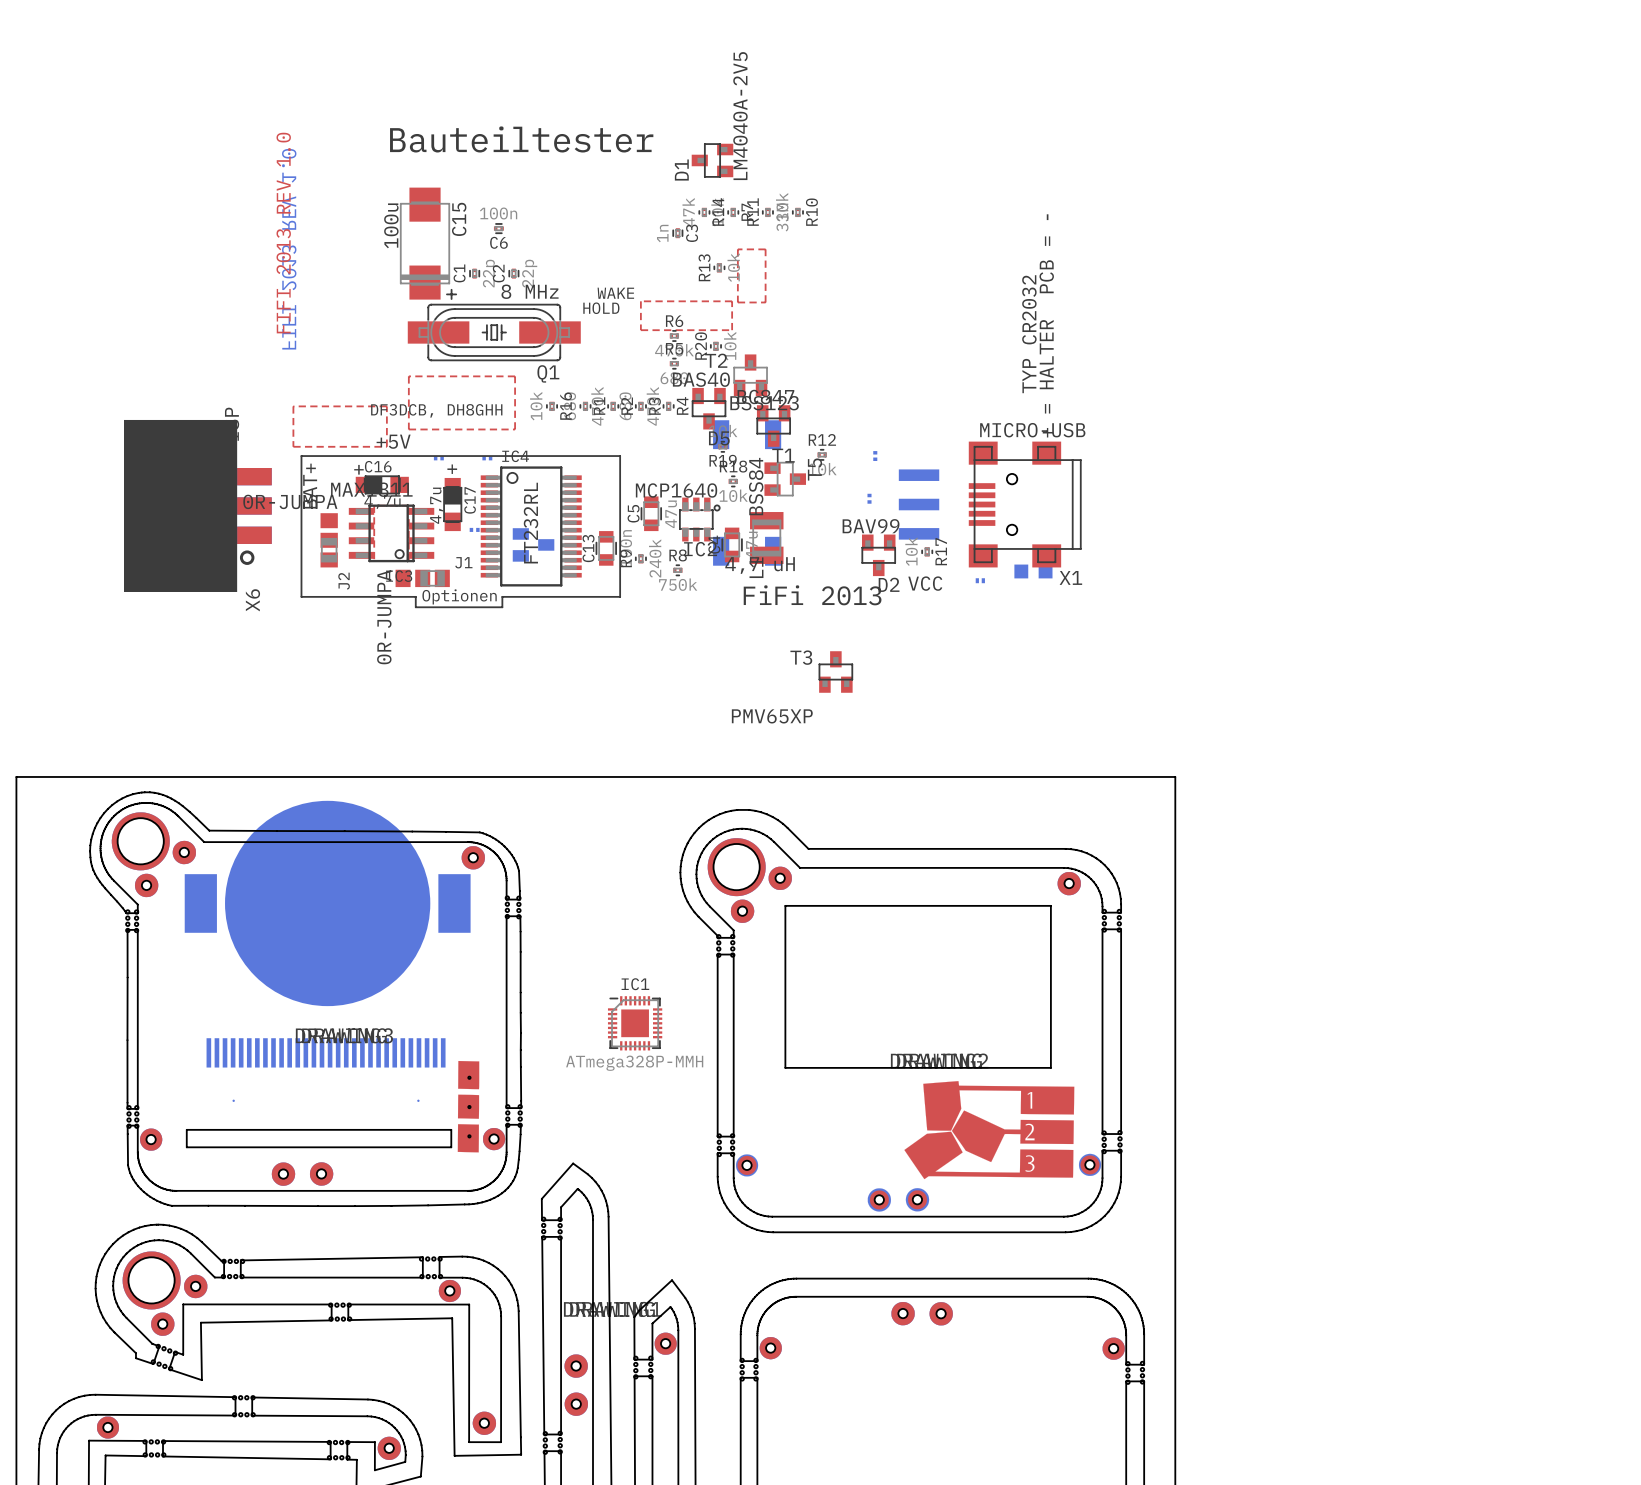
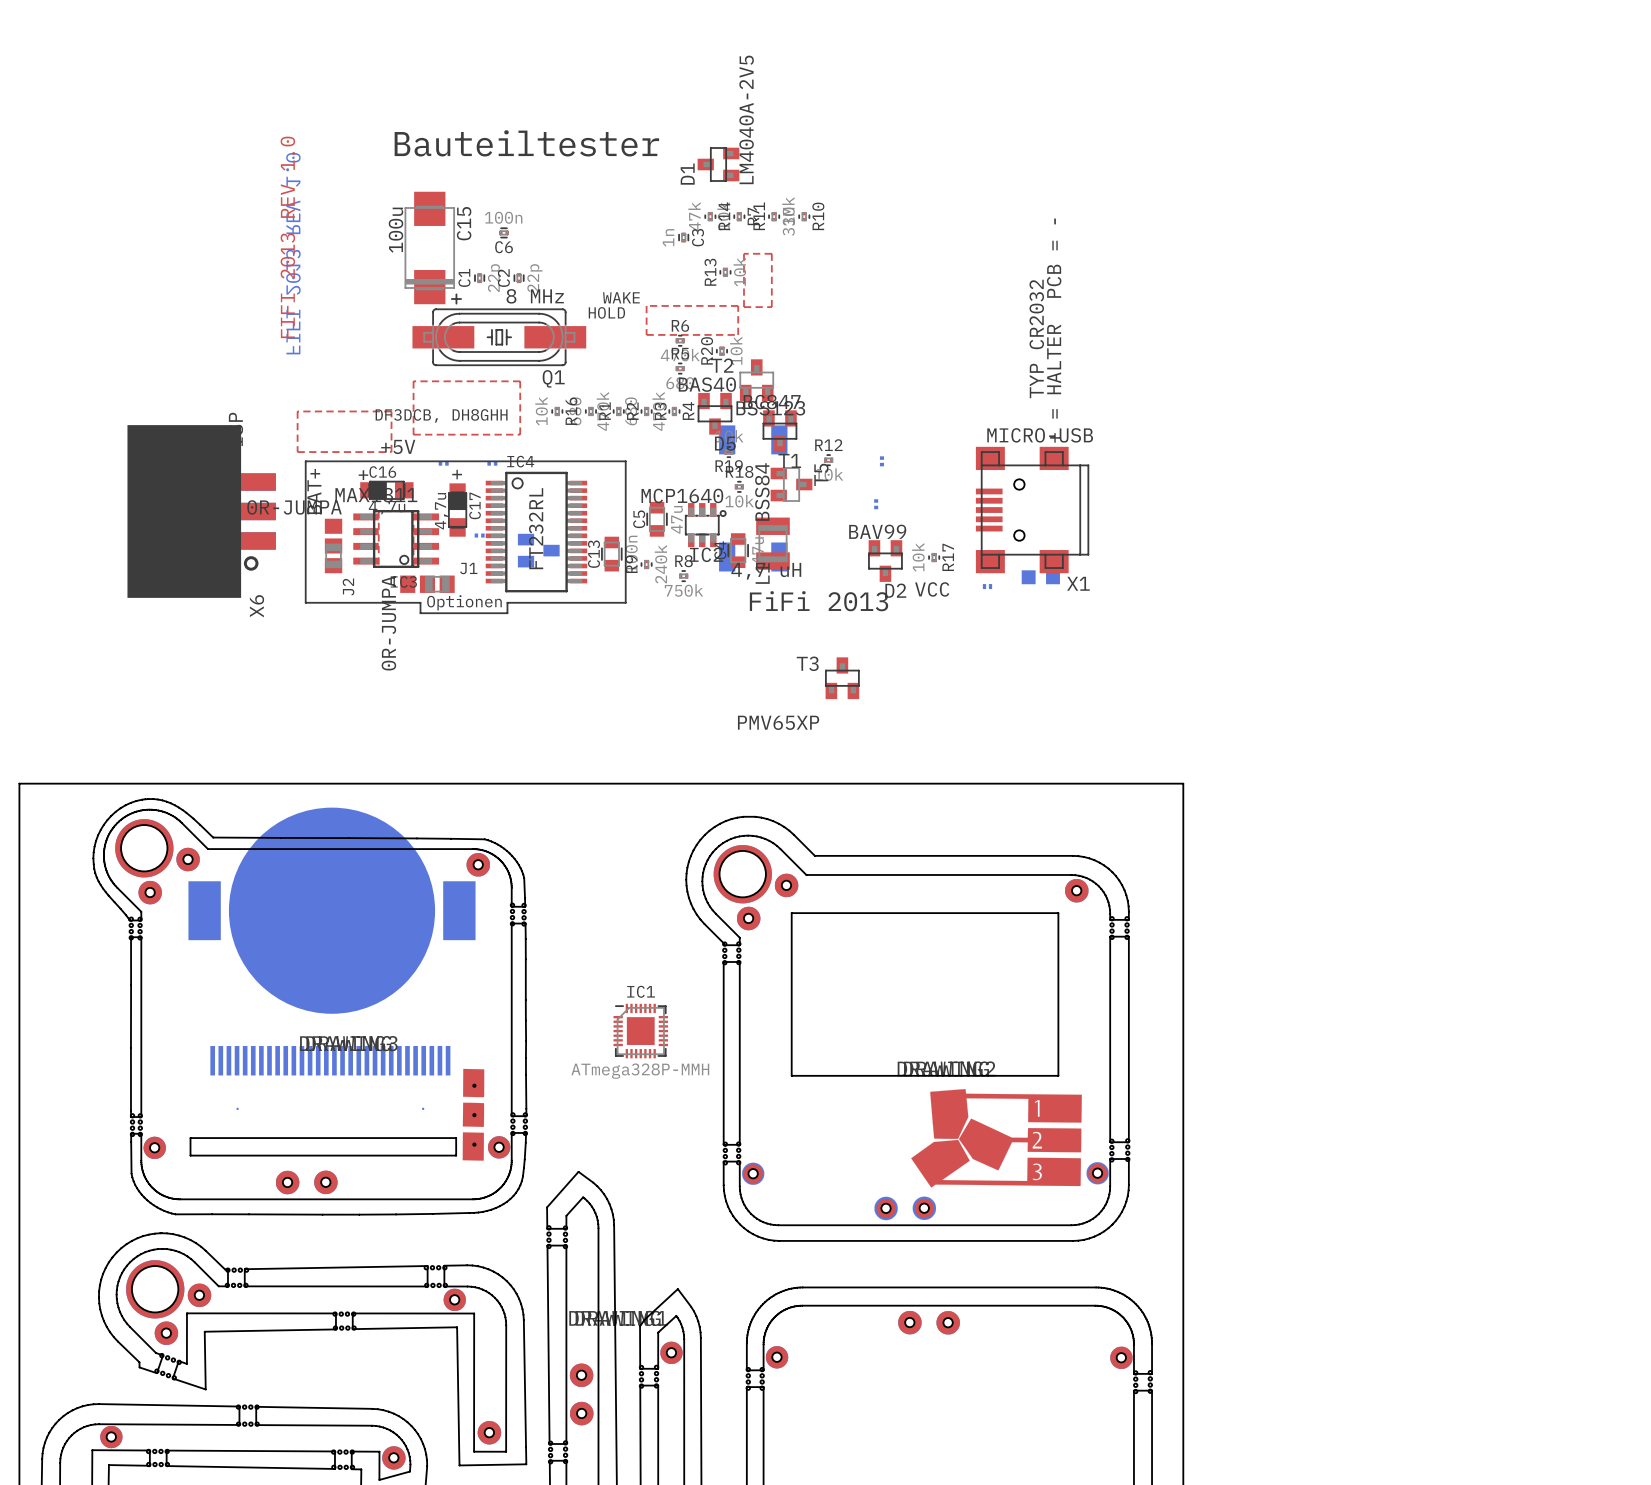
part: (919, 504) -> none

